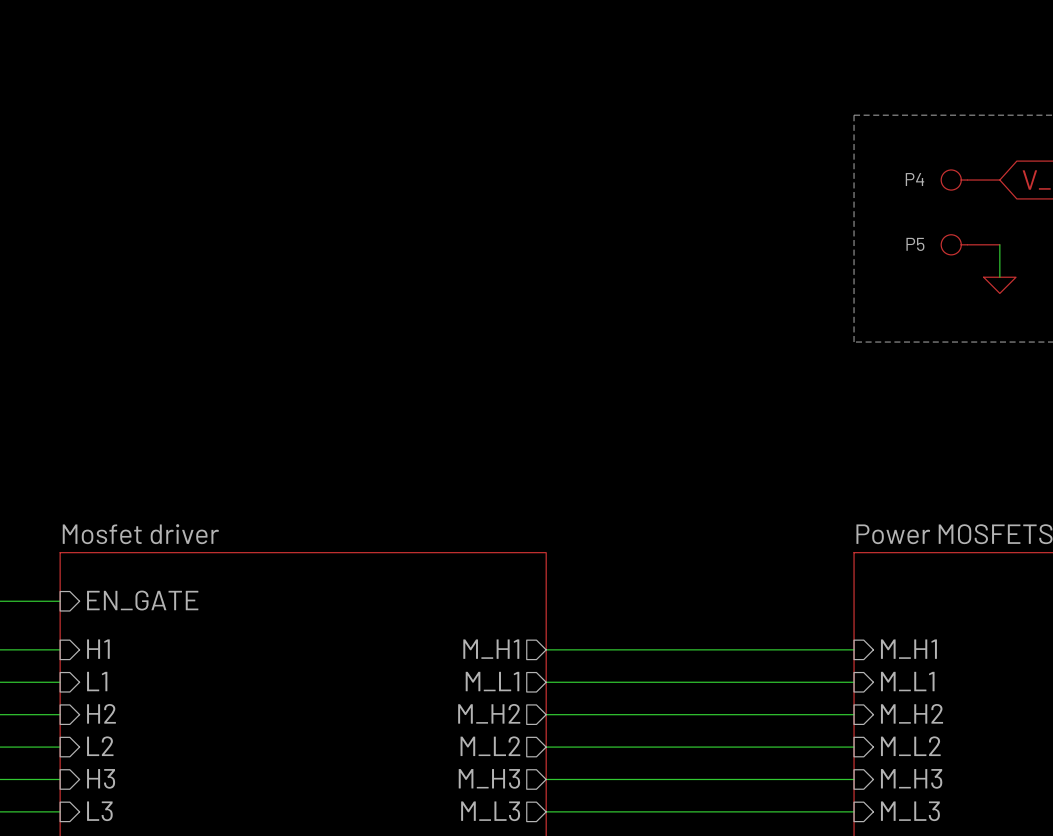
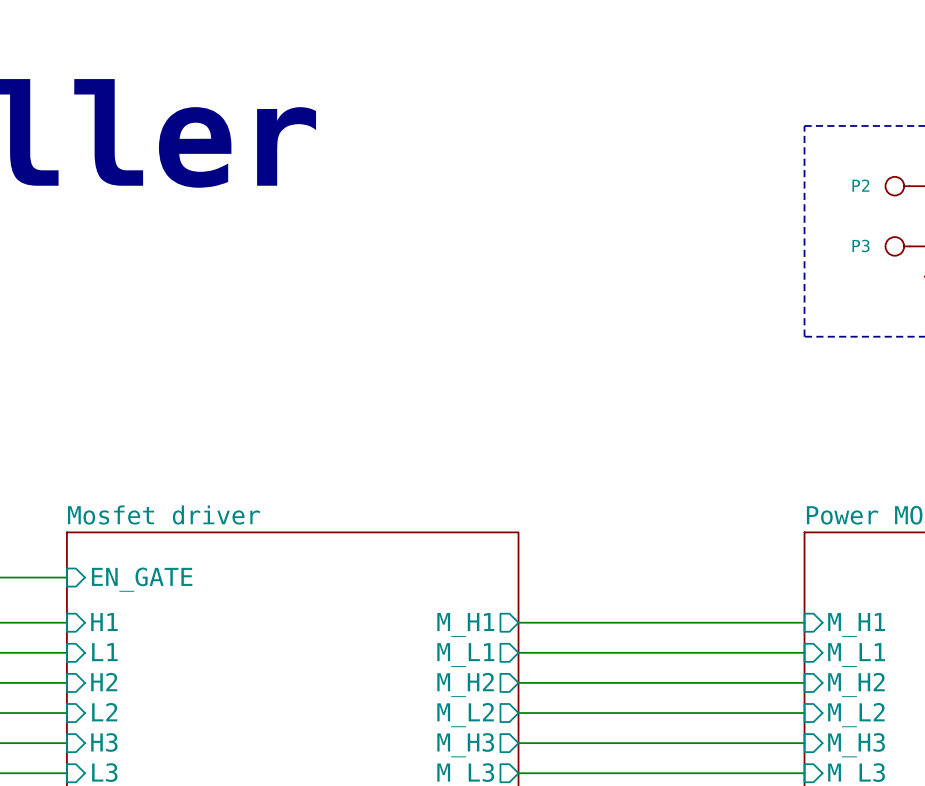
P4 name: P4 (914, 179) -> P2 (860, 185)
P5 name: P5 (915, 244) -> P3 (860, 245)

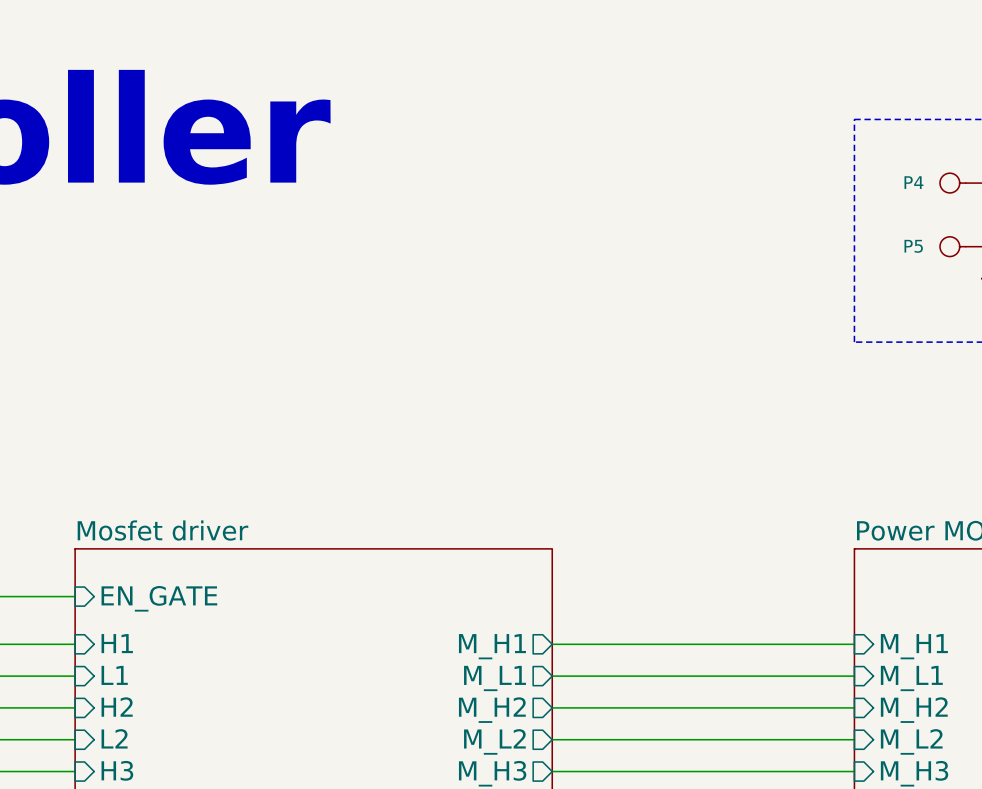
P2 name: P2 (860, 185) -> P4 (913, 182)
P3 name: P3 (860, 245) -> P5 (913, 246)

